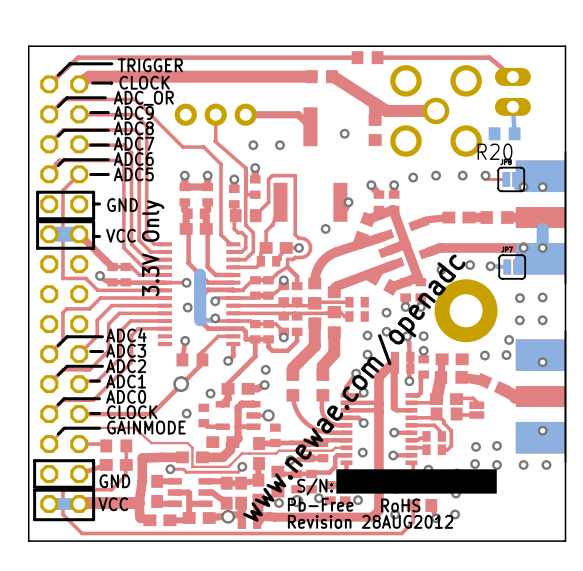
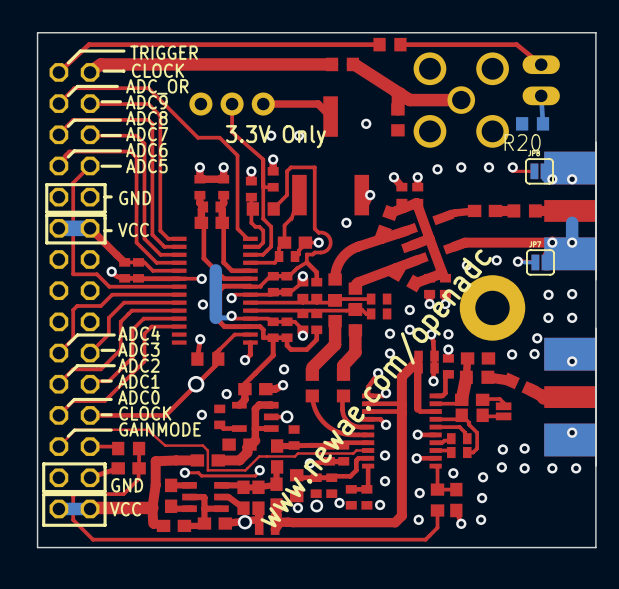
text rotation: 0° (153, 248) -> 90° clockwise (275, 136)
text position: 3.3V Only (153, 248) -> 3.3V Only (275, 136)
drawing: [336, 469, 497, 494] -> none
text: S/N: (315, 486) -> none
text: Pb-Free (320, 504) -> none
text: RoHS (400, 505) -> none
text: Revision 28AUG2012 (370, 521) -> none

